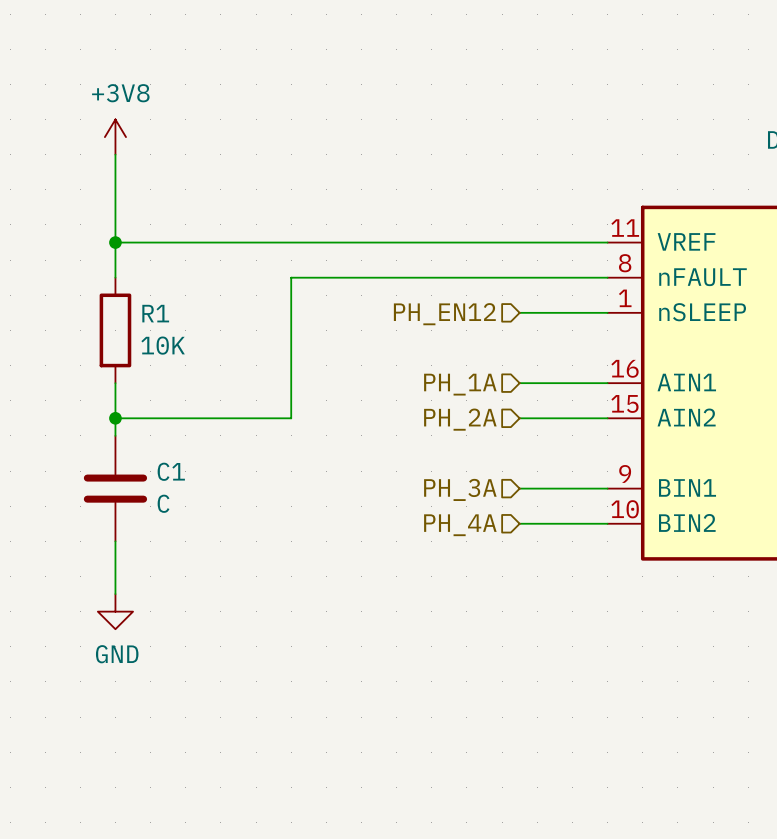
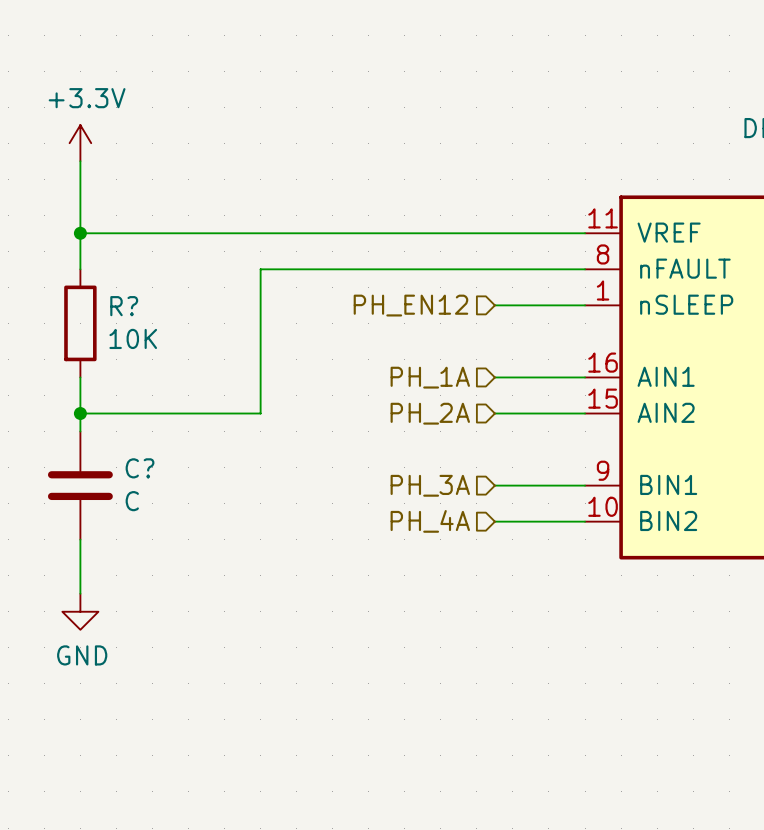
power symbol: +3V8 (115, 137) -> none
power symbol: none -> +3.3V (80, 143)
R1 name: R1 (155, 313) -> R? (124, 306)
C1 name: C1 (171, 471) -> C? (140, 468)

